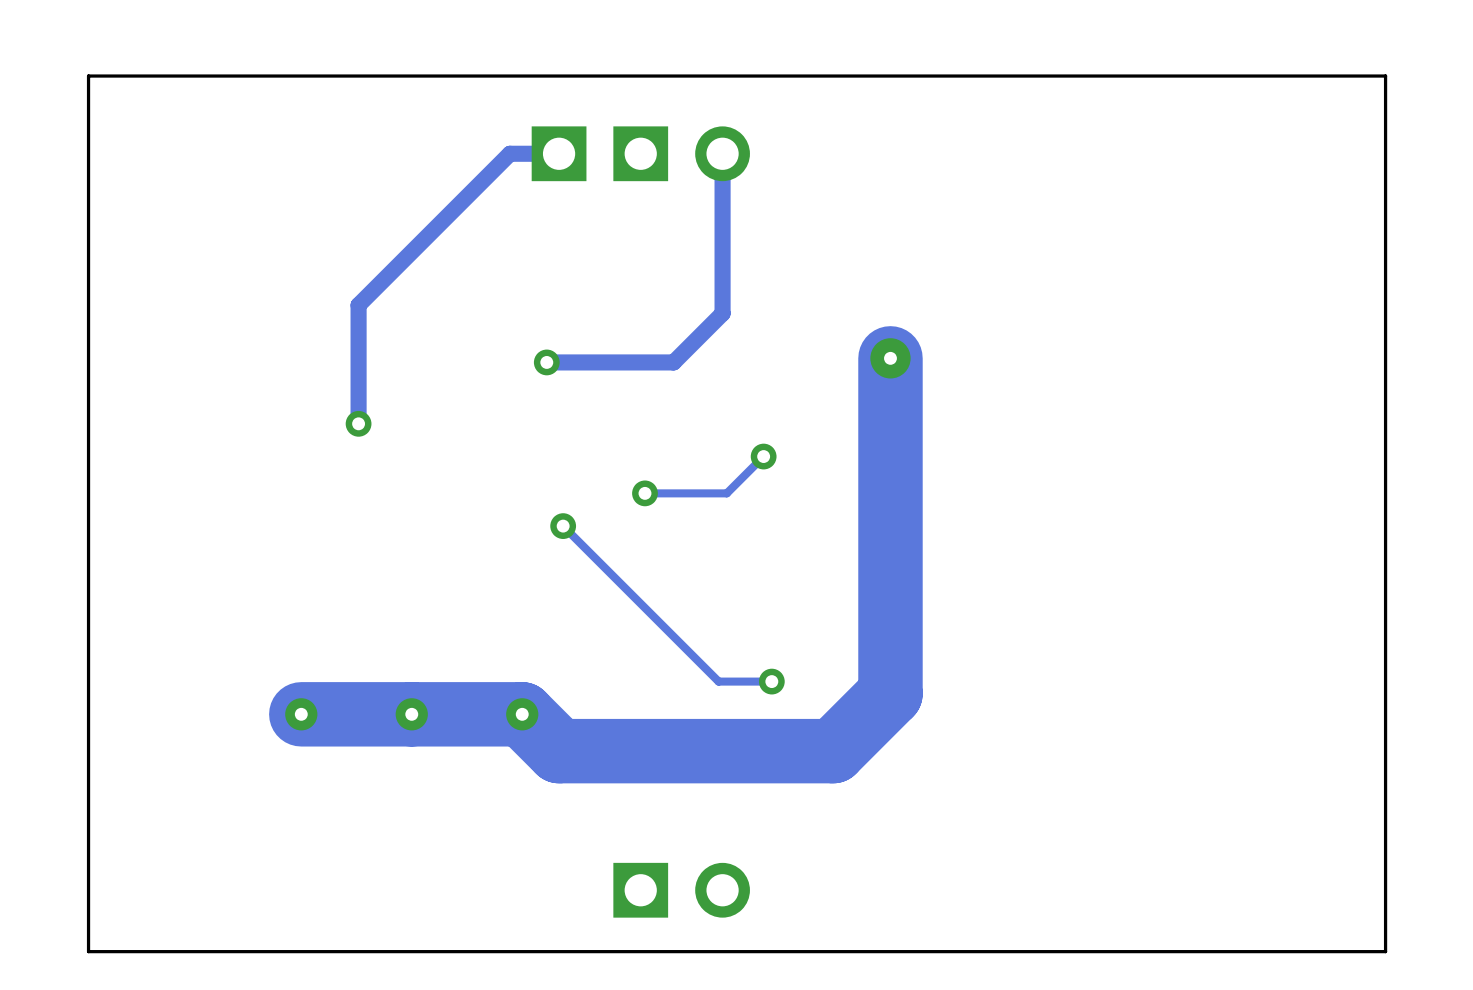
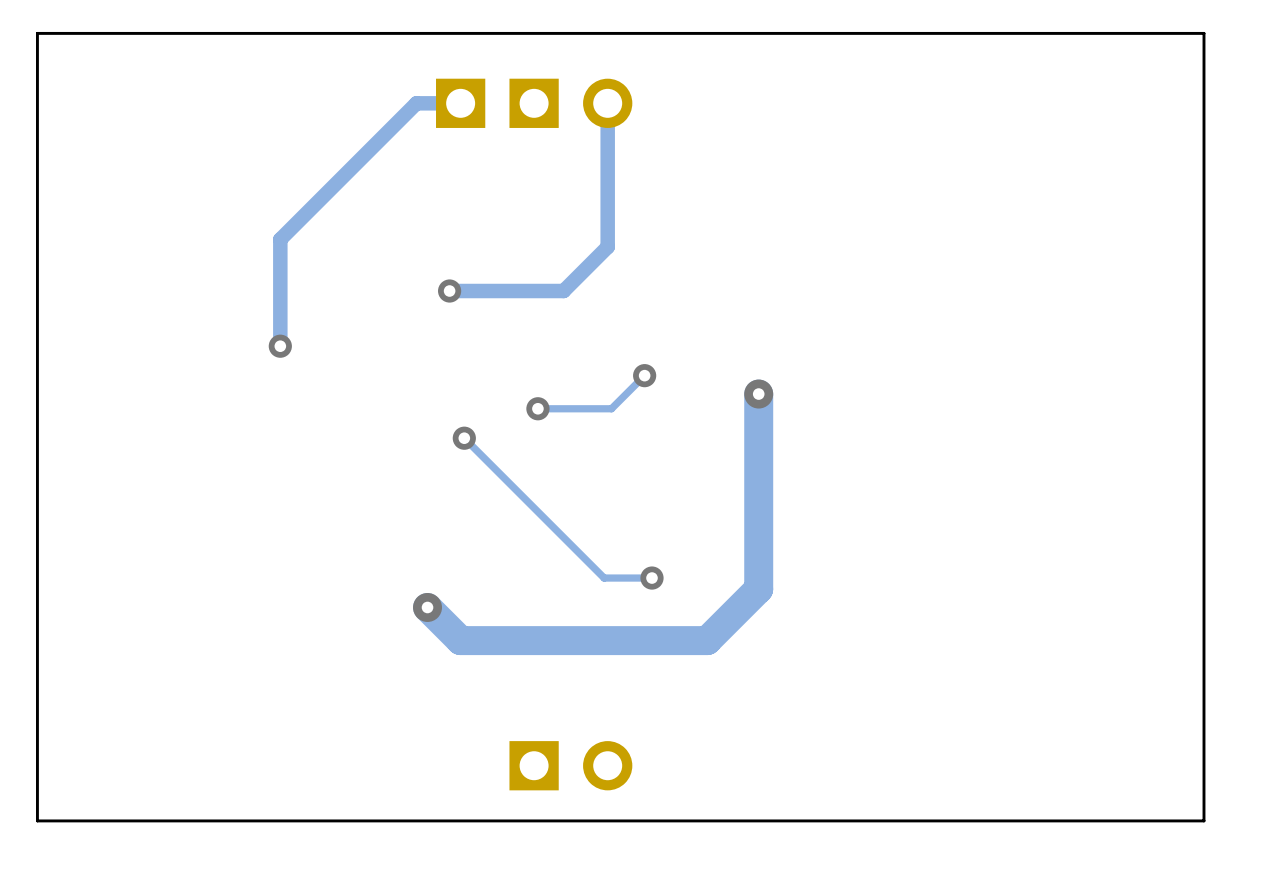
track: (890, 358) (890, 477) -> none
via: (890, 358) -> none
track width: thick (890, 477) (890, 693) (833, 751) (559, 751) (522, 714) -> thin (758, 394) (758, 589) (707, 640) (460, 640) (427, 607)
via: none -> (758, 394)
via: (301, 714) -> none
via: (411, 714) -> none
track: (522, 714) (301, 714) -> none

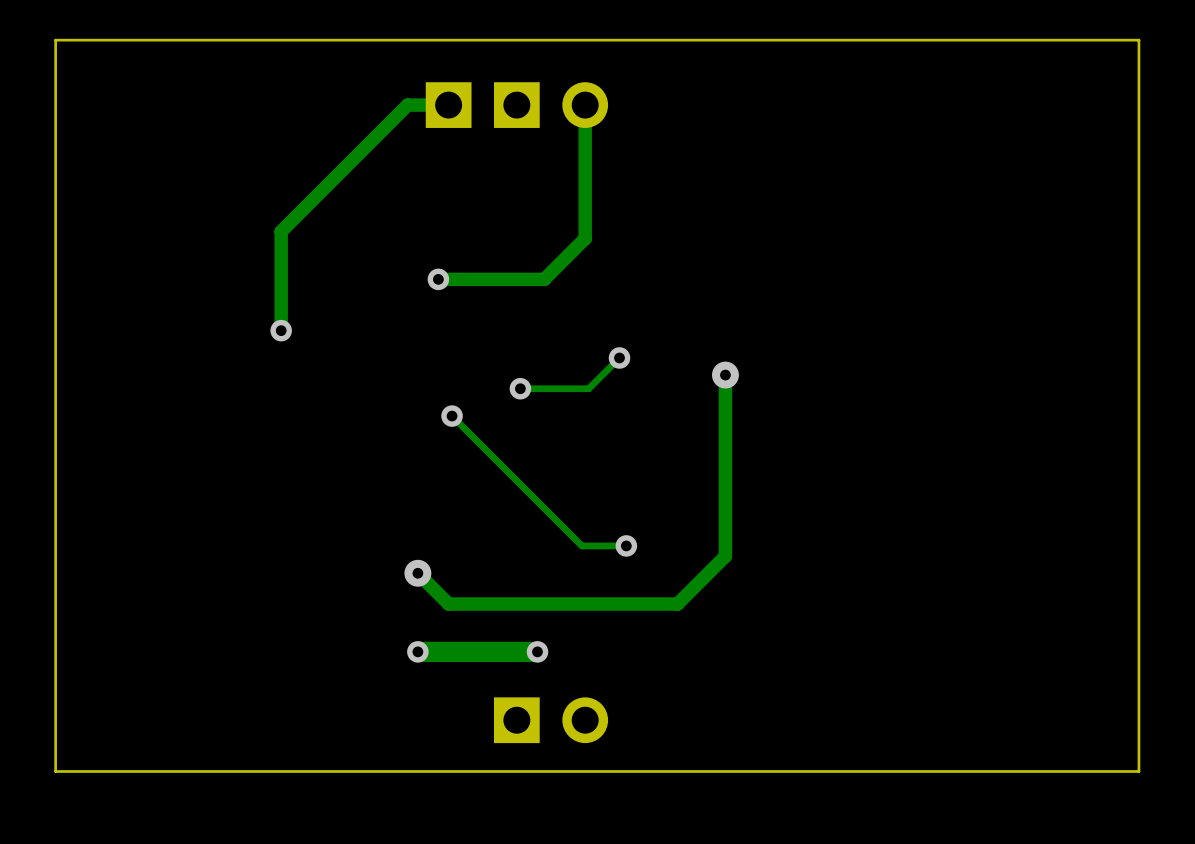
track width: thick (758, 394) (758, 589) (707, 640) (460, 640) (427, 607) -> thin (725, 375) (725, 556) (677, 604) (448, 604) (417, 573)
via: none -> (417, 651)
track: none -> (537, 651) (417, 651)
via: none -> (537, 651)

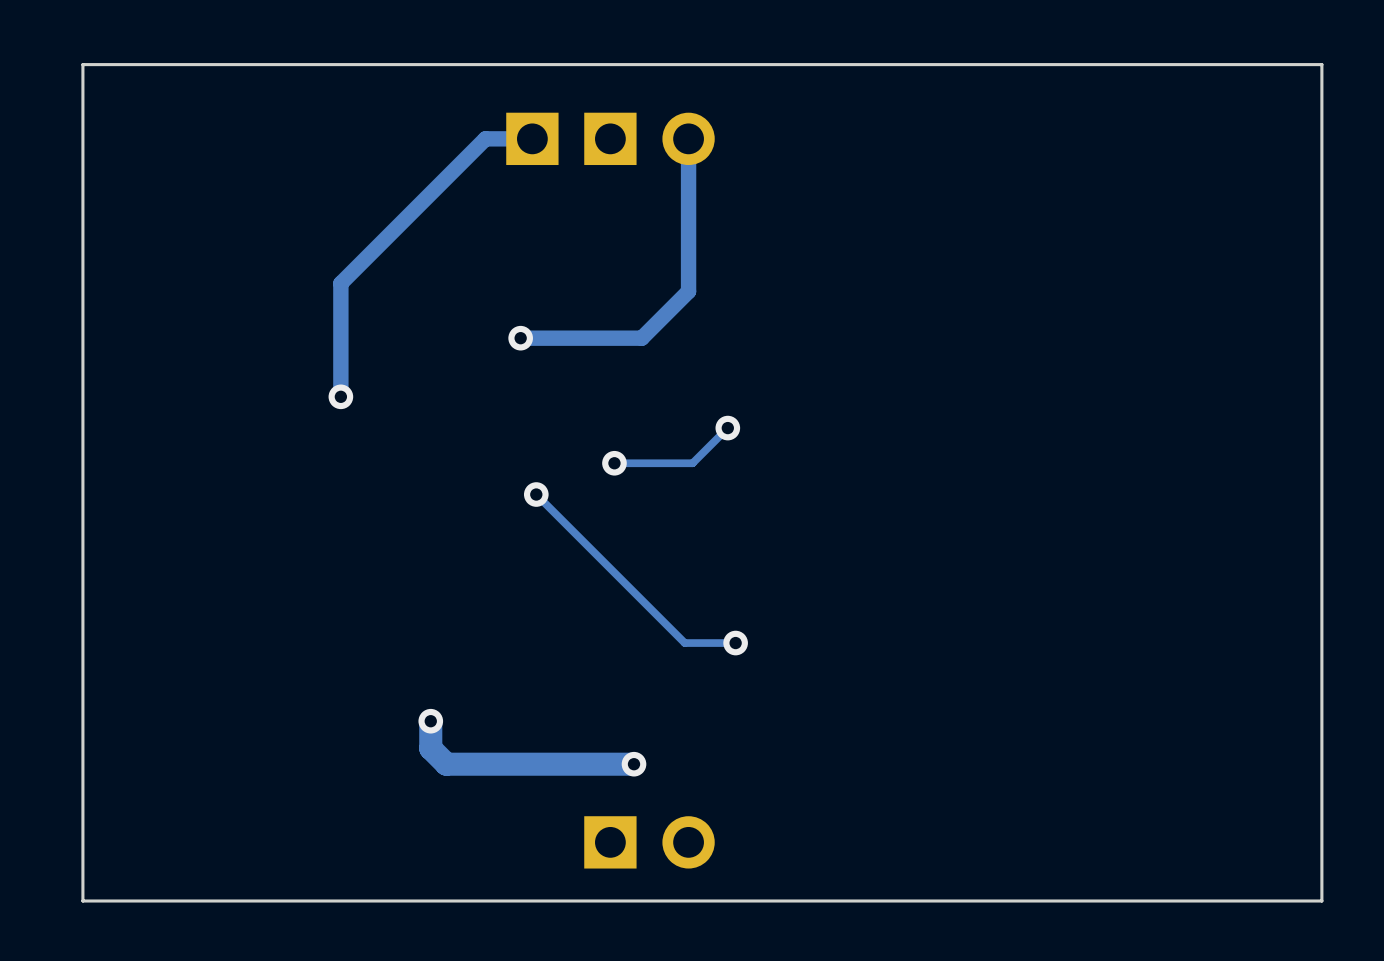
track: (725, 375) (725, 556) (677, 604) (448, 604) (417, 573) -> none
via: (725, 375) -> none
via: (417, 573) -> none
track: none -> (430, 721) (430, 748) (446, 764) (497, 764)
via position: (417, 651) -> (430, 721)

